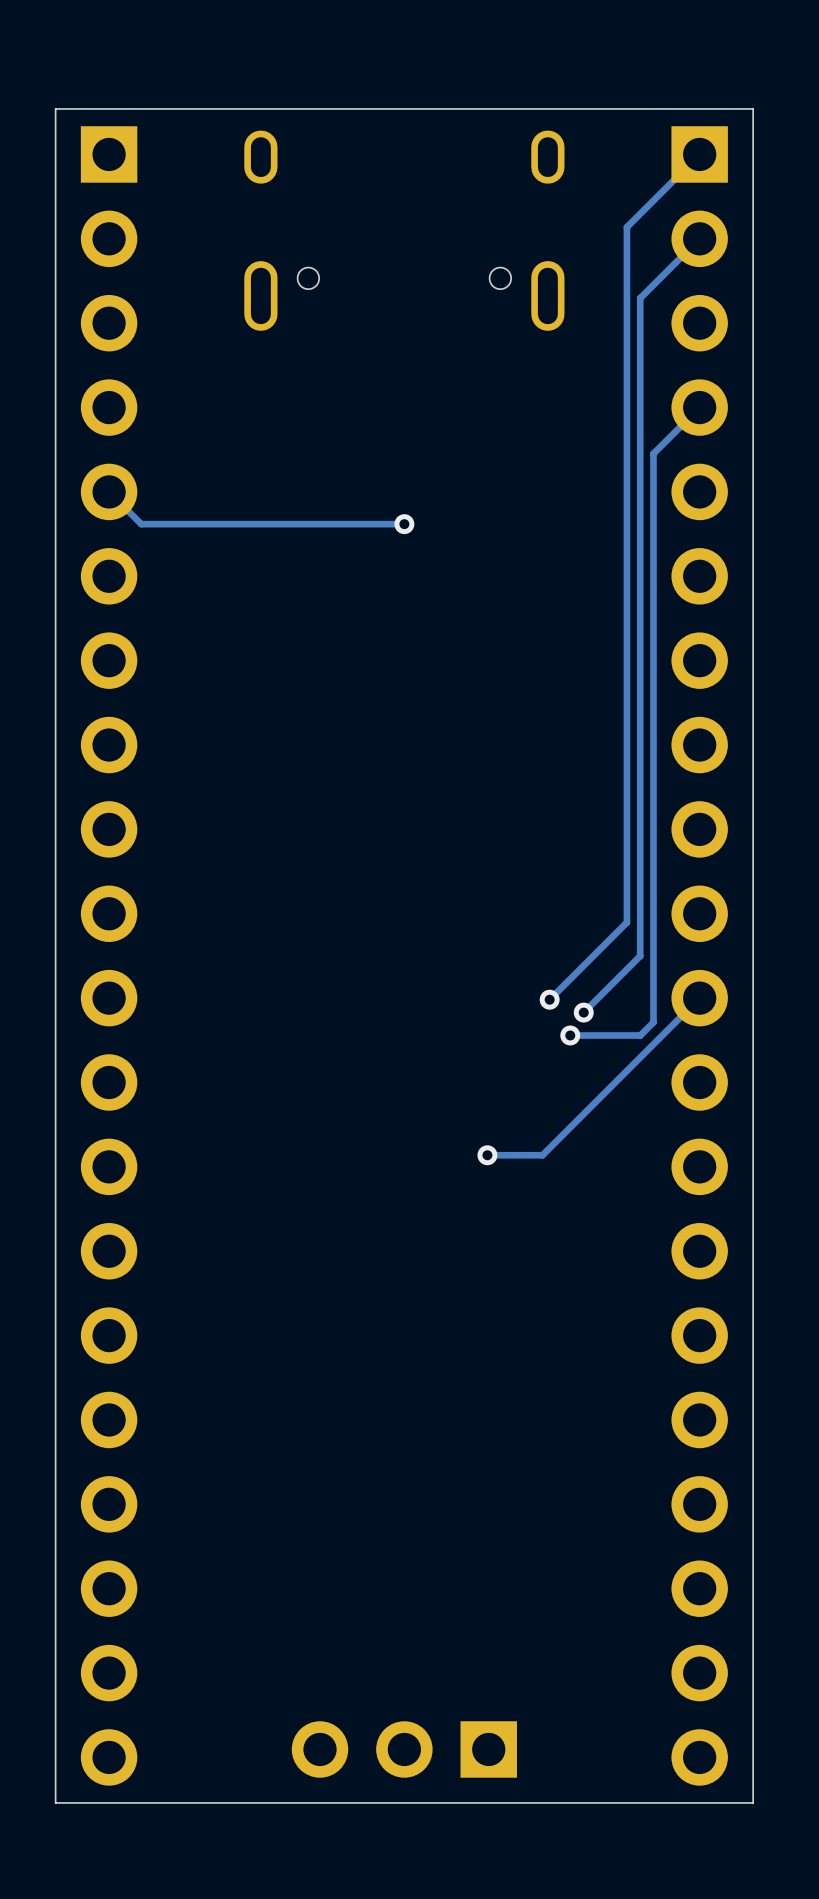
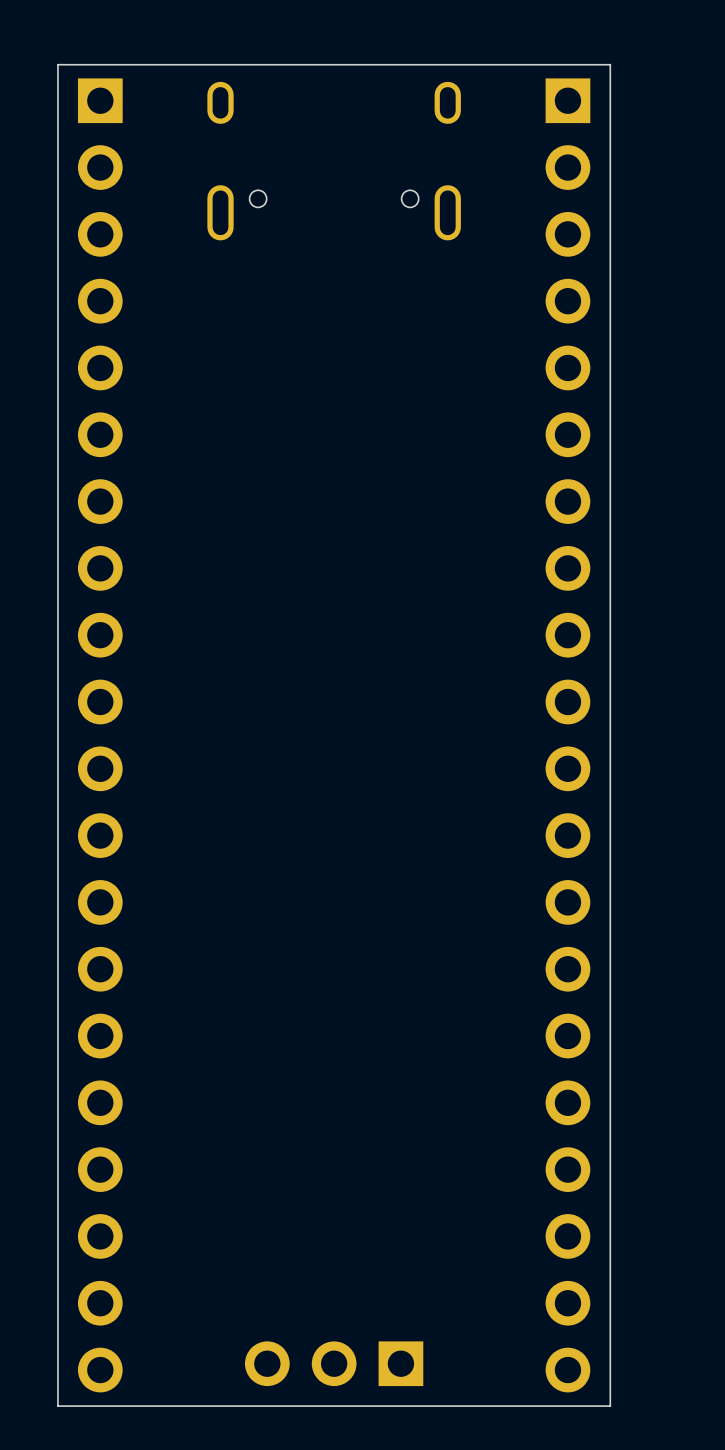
track: (699, 154) (626, 227) (626, 922) (549, 999) -> none
track: (699, 238) (640, 298) (640, 956) (583, 1012) -> none
track: (699, 407) (653, 453) (653, 1022) (640, 1035) (570, 1035) -> none
track: (109, 491) (141, 524) (404, 524) -> none
via: (404, 524) -> none
track: (699, 998) (542, 1155) (487, 1155) -> none
via: (549, 999) -> none
via: (583, 1012) -> none
via: (570, 1035) -> none
via: (487, 1155) -> none

